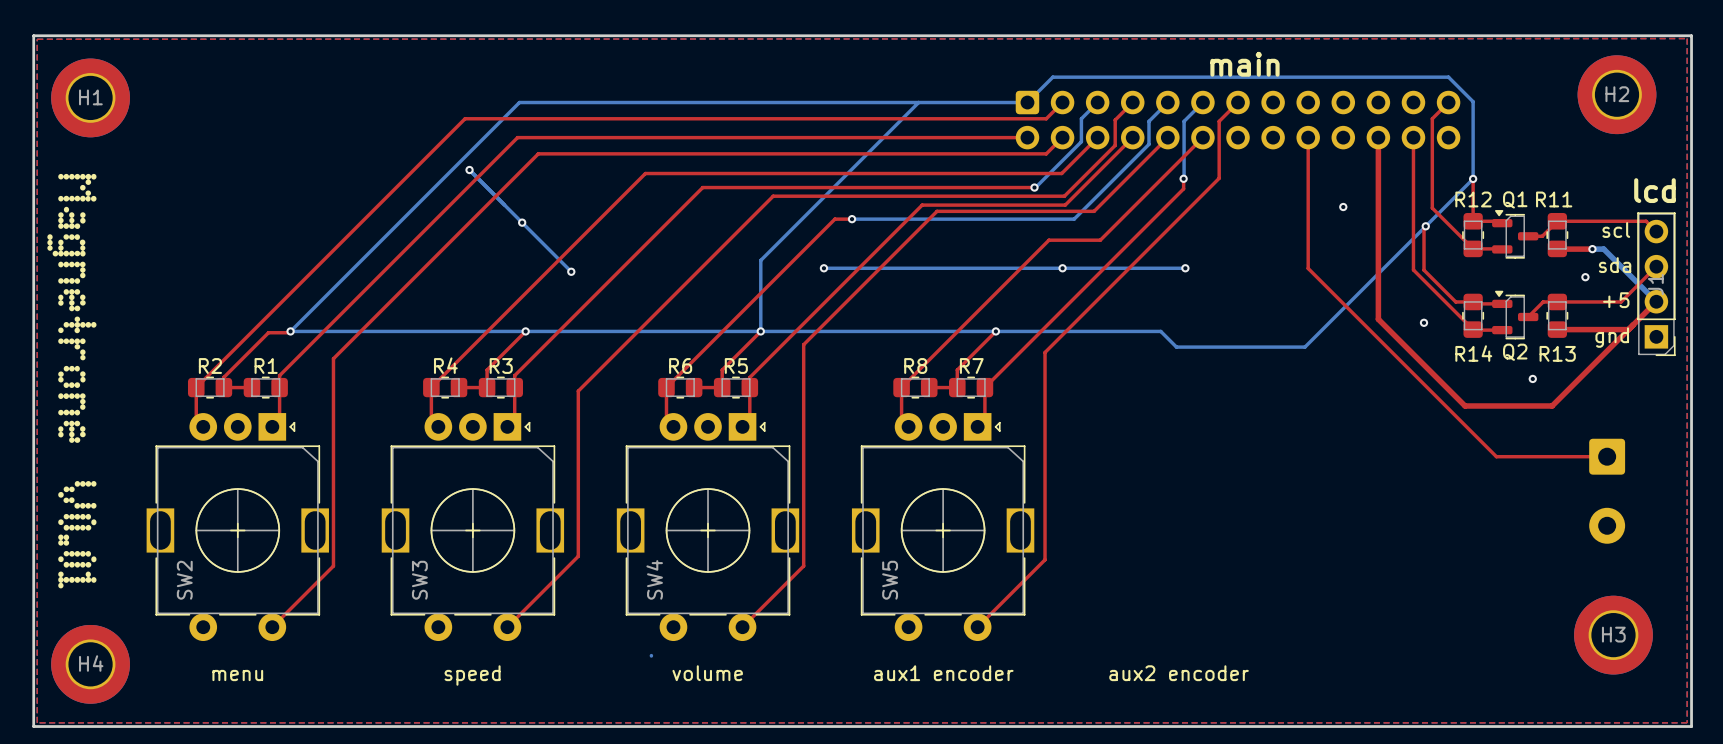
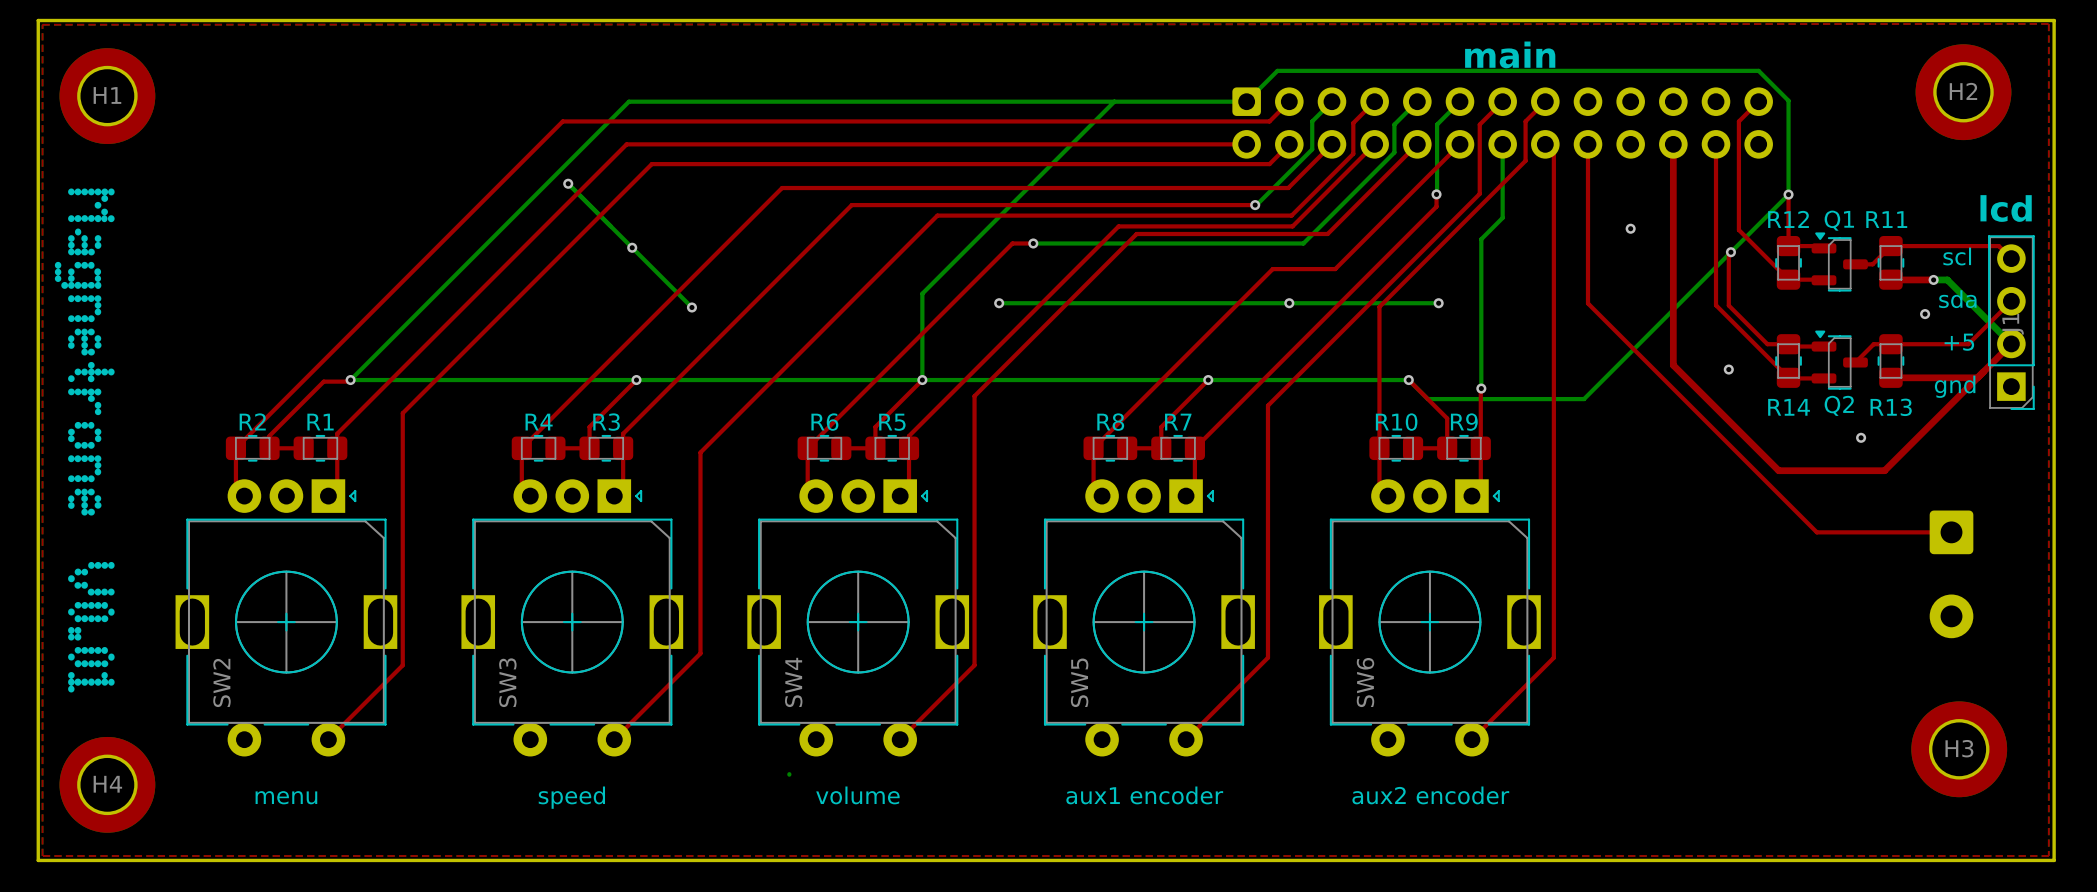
top track: none -> (1545, 101) (1525, 121) (1525, 160) (1379, 306) (1379, 487)
bottom track: none -> (1502, 144) (1502, 217) (1481, 239) (1481, 388)
top track: none -> (1553, 152) (1553, 657) (1471, 739)
top track: none -> (1408, 380) (1447, 418) (1447, 448) (1413, 448)
via: none -> (1408, 380)
top track: none -> (1481, 388) (1480, 487)
via: none -> (1481, 388)
R10: none -> (1396, 448)
R9: none -> (1463, 448)
SW6: none -> (1429, 617)

